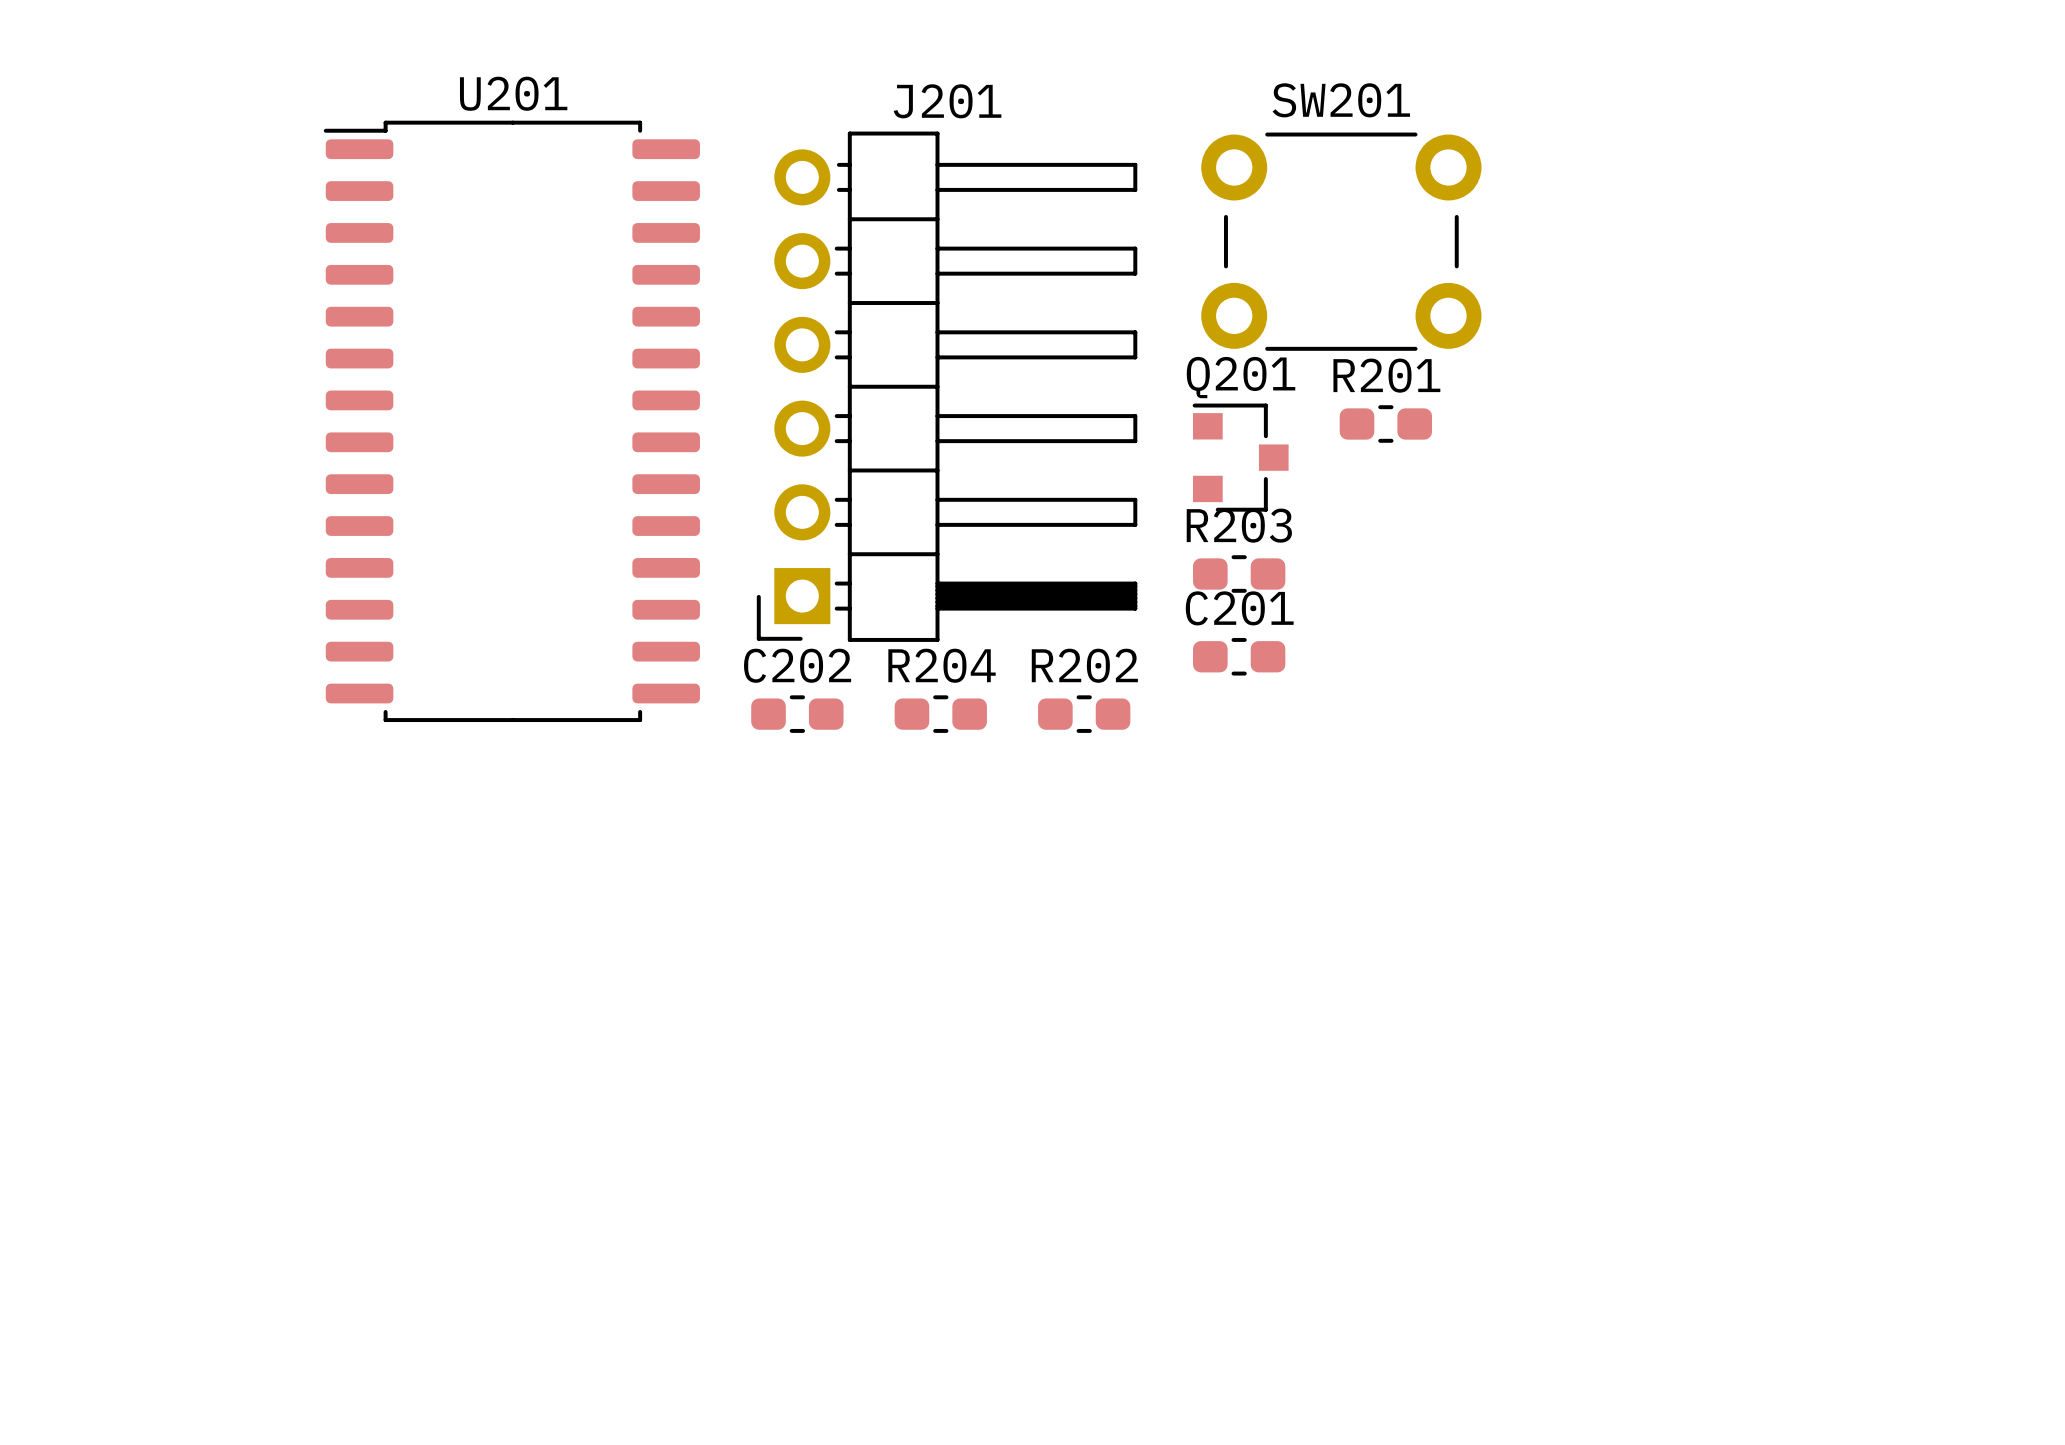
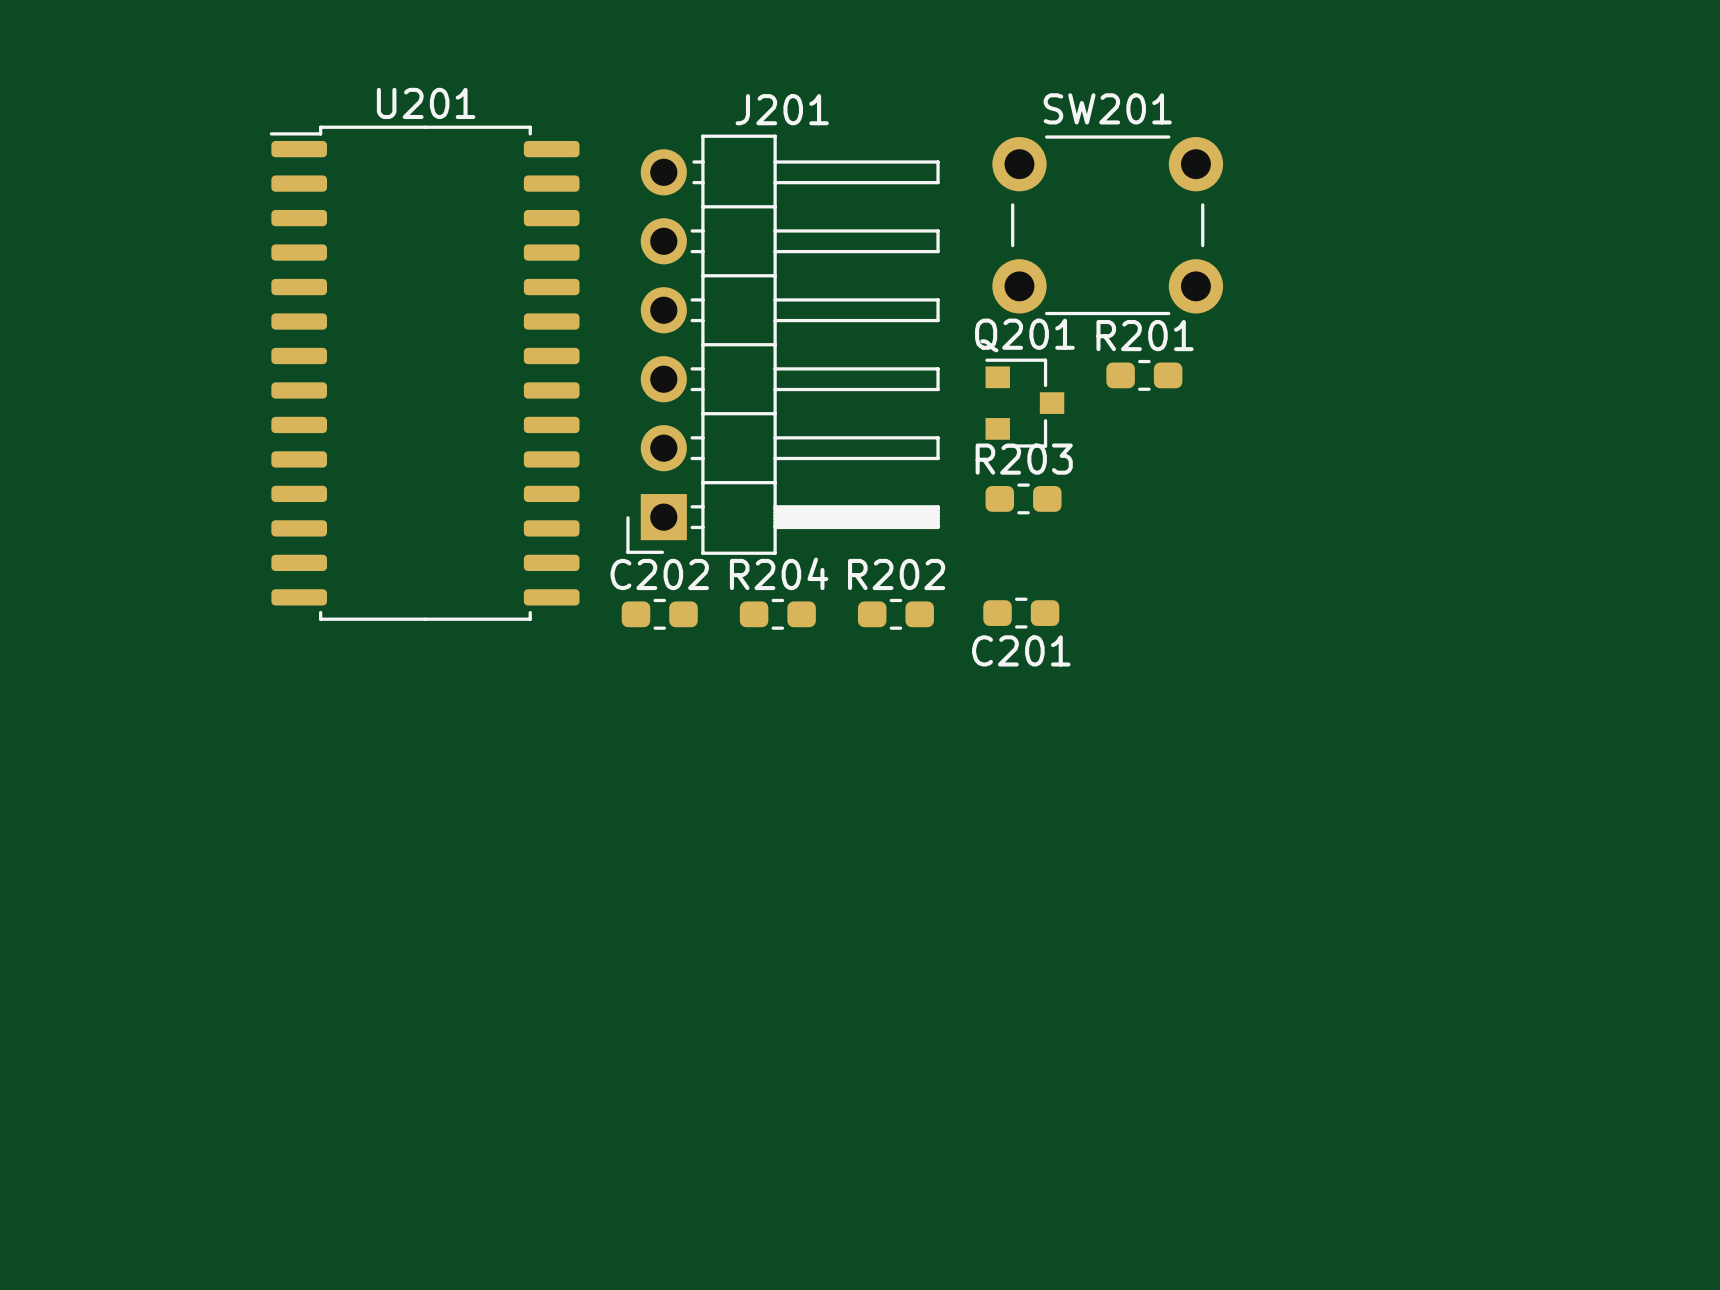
C201 name position: C201 (1239, 608) -> C201 (1021, 650)
C201 position: (1239, 656) -> (1021, 613)

